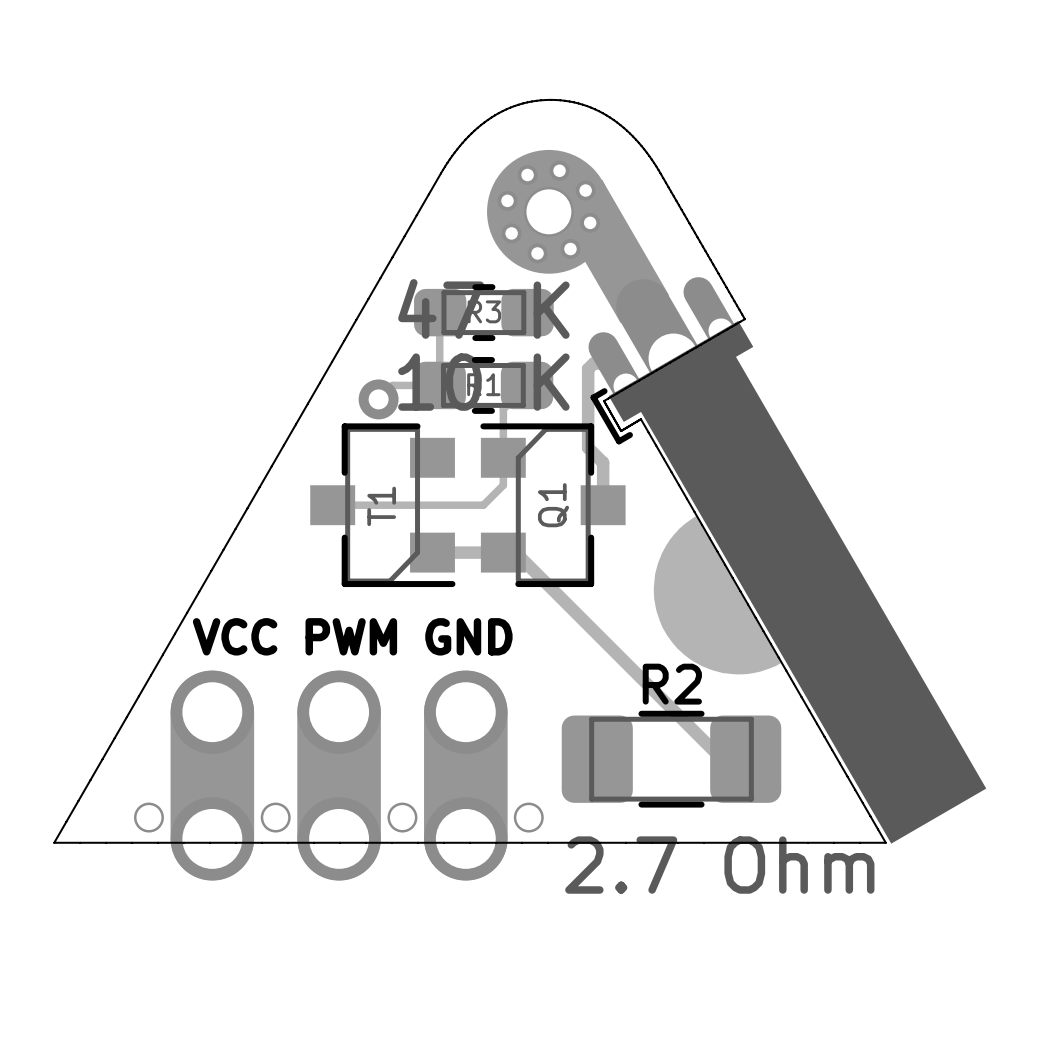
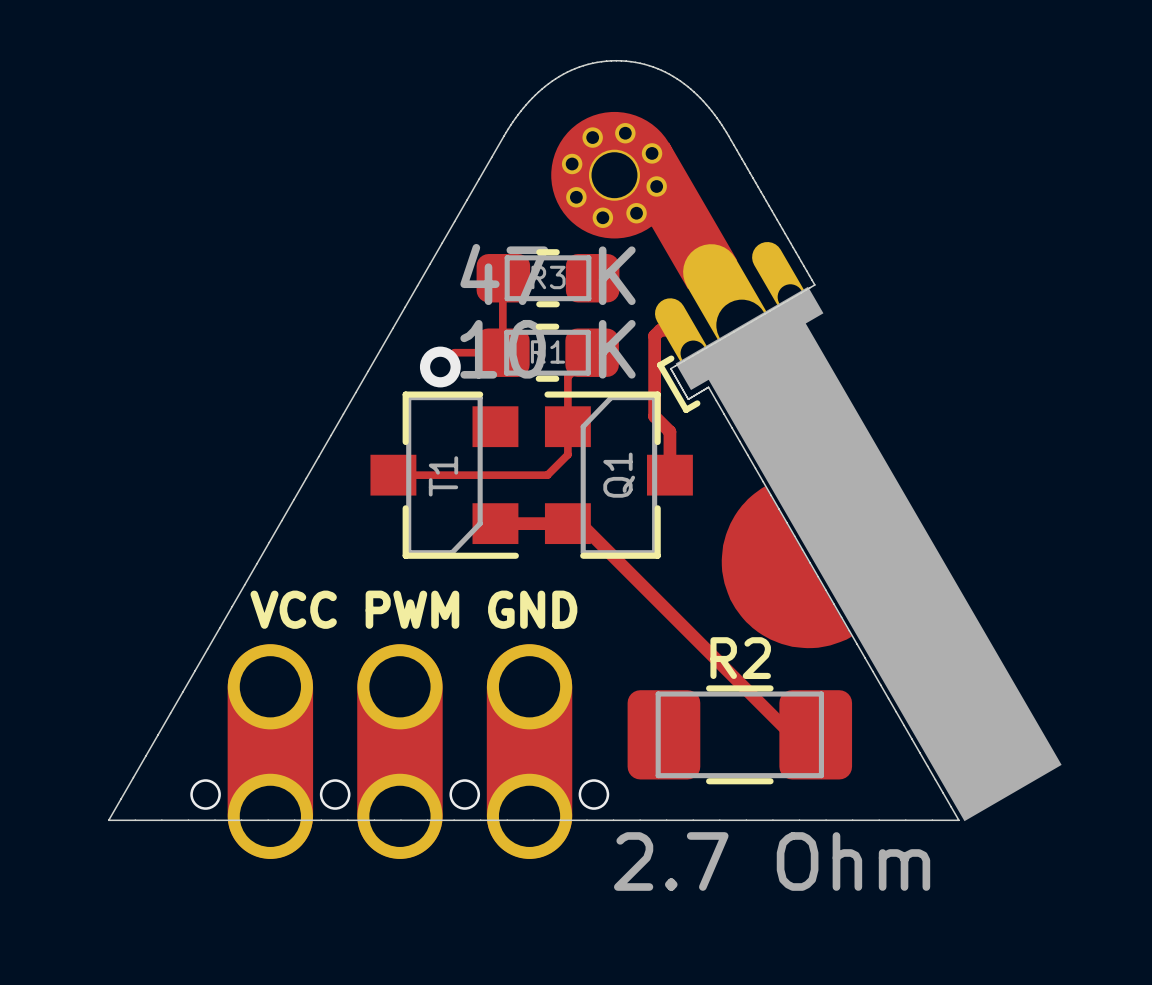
R2 value position: 2.7 Ohm (719, 865) -> 2.7 Ohm (772, 861)

